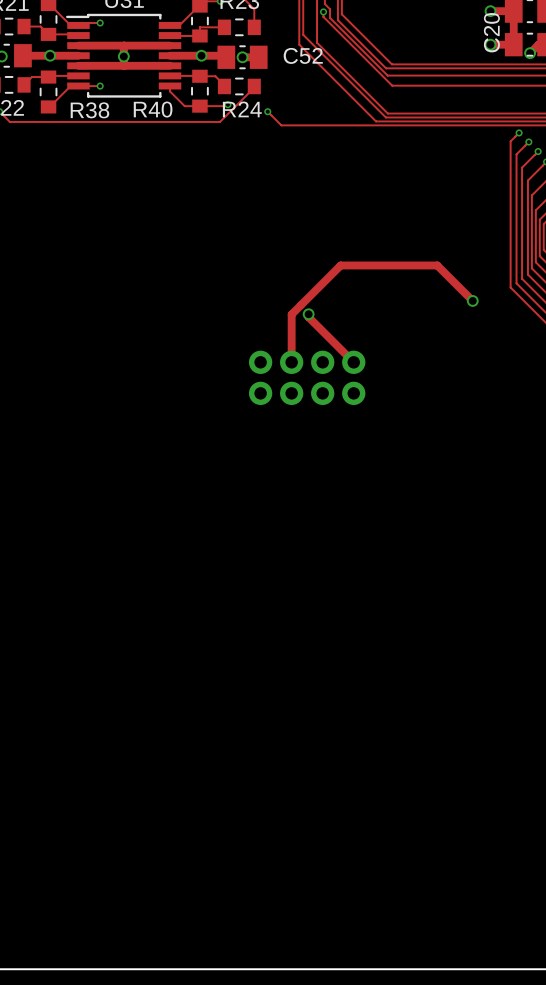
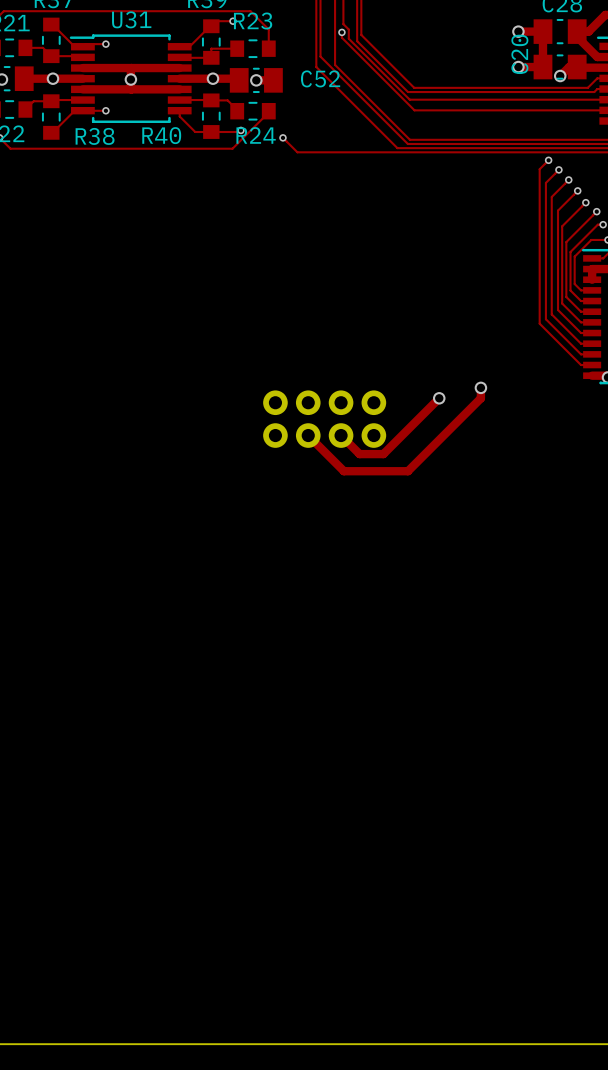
track: (472, 300) (437, 265) (340, 265) (291, 314) (291, 362) -> none
via: (472, 300) -> none
track: (308, 314) (308, 317) (353, 362) -> none
via: (308, 314) -> none
track: none -> (480, 387) (480, 398) (408, 471) (343, 471) (308, 435)
via: none -> (480, 387)
track: none -> (439, 398) (383, 454) (359, 454) (341, 435)
via: none -> (439, 398)

